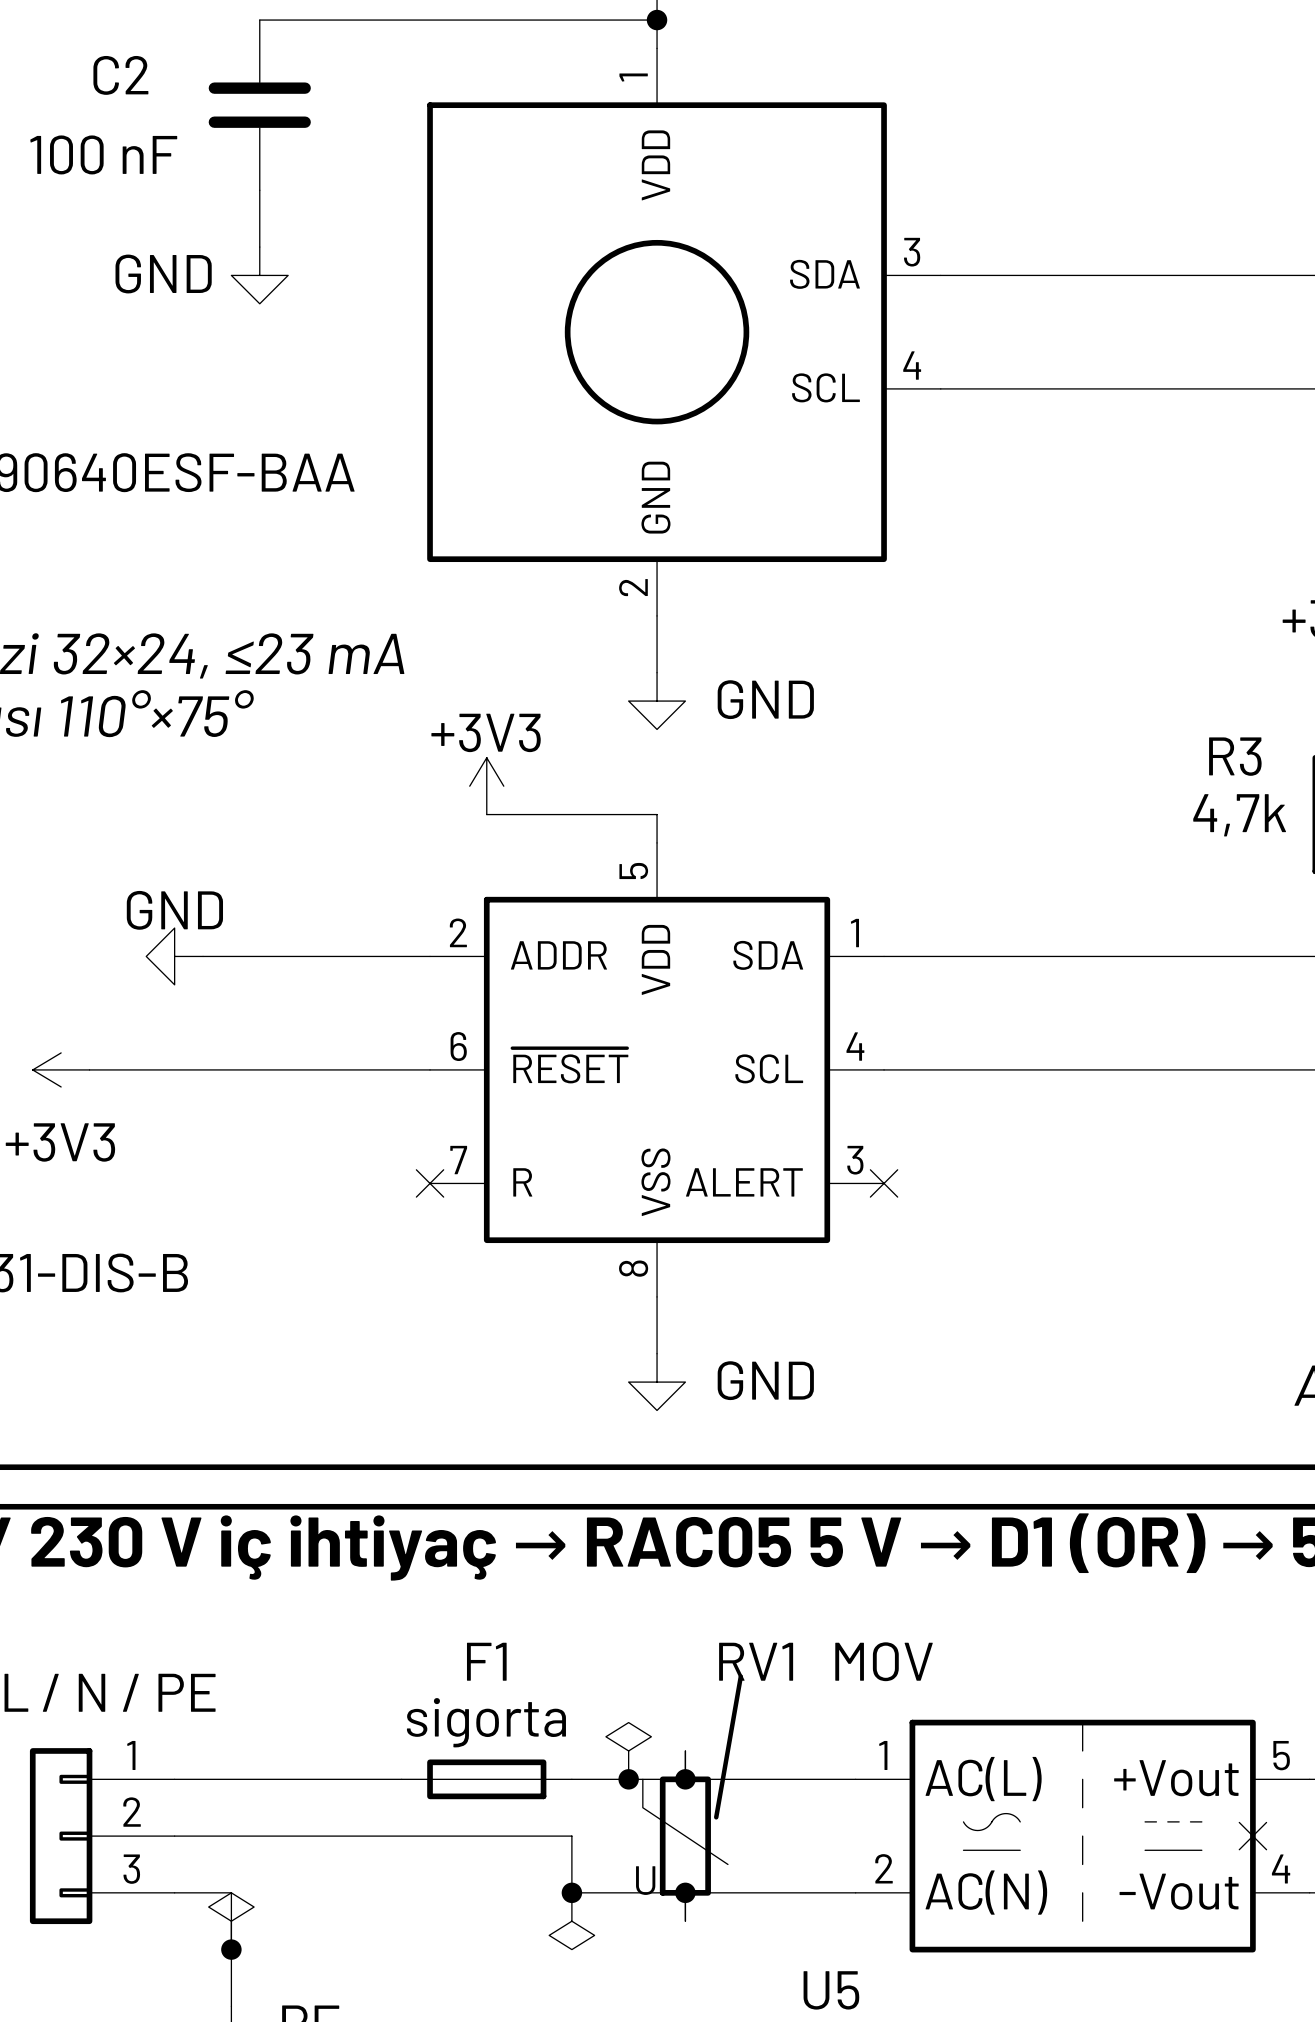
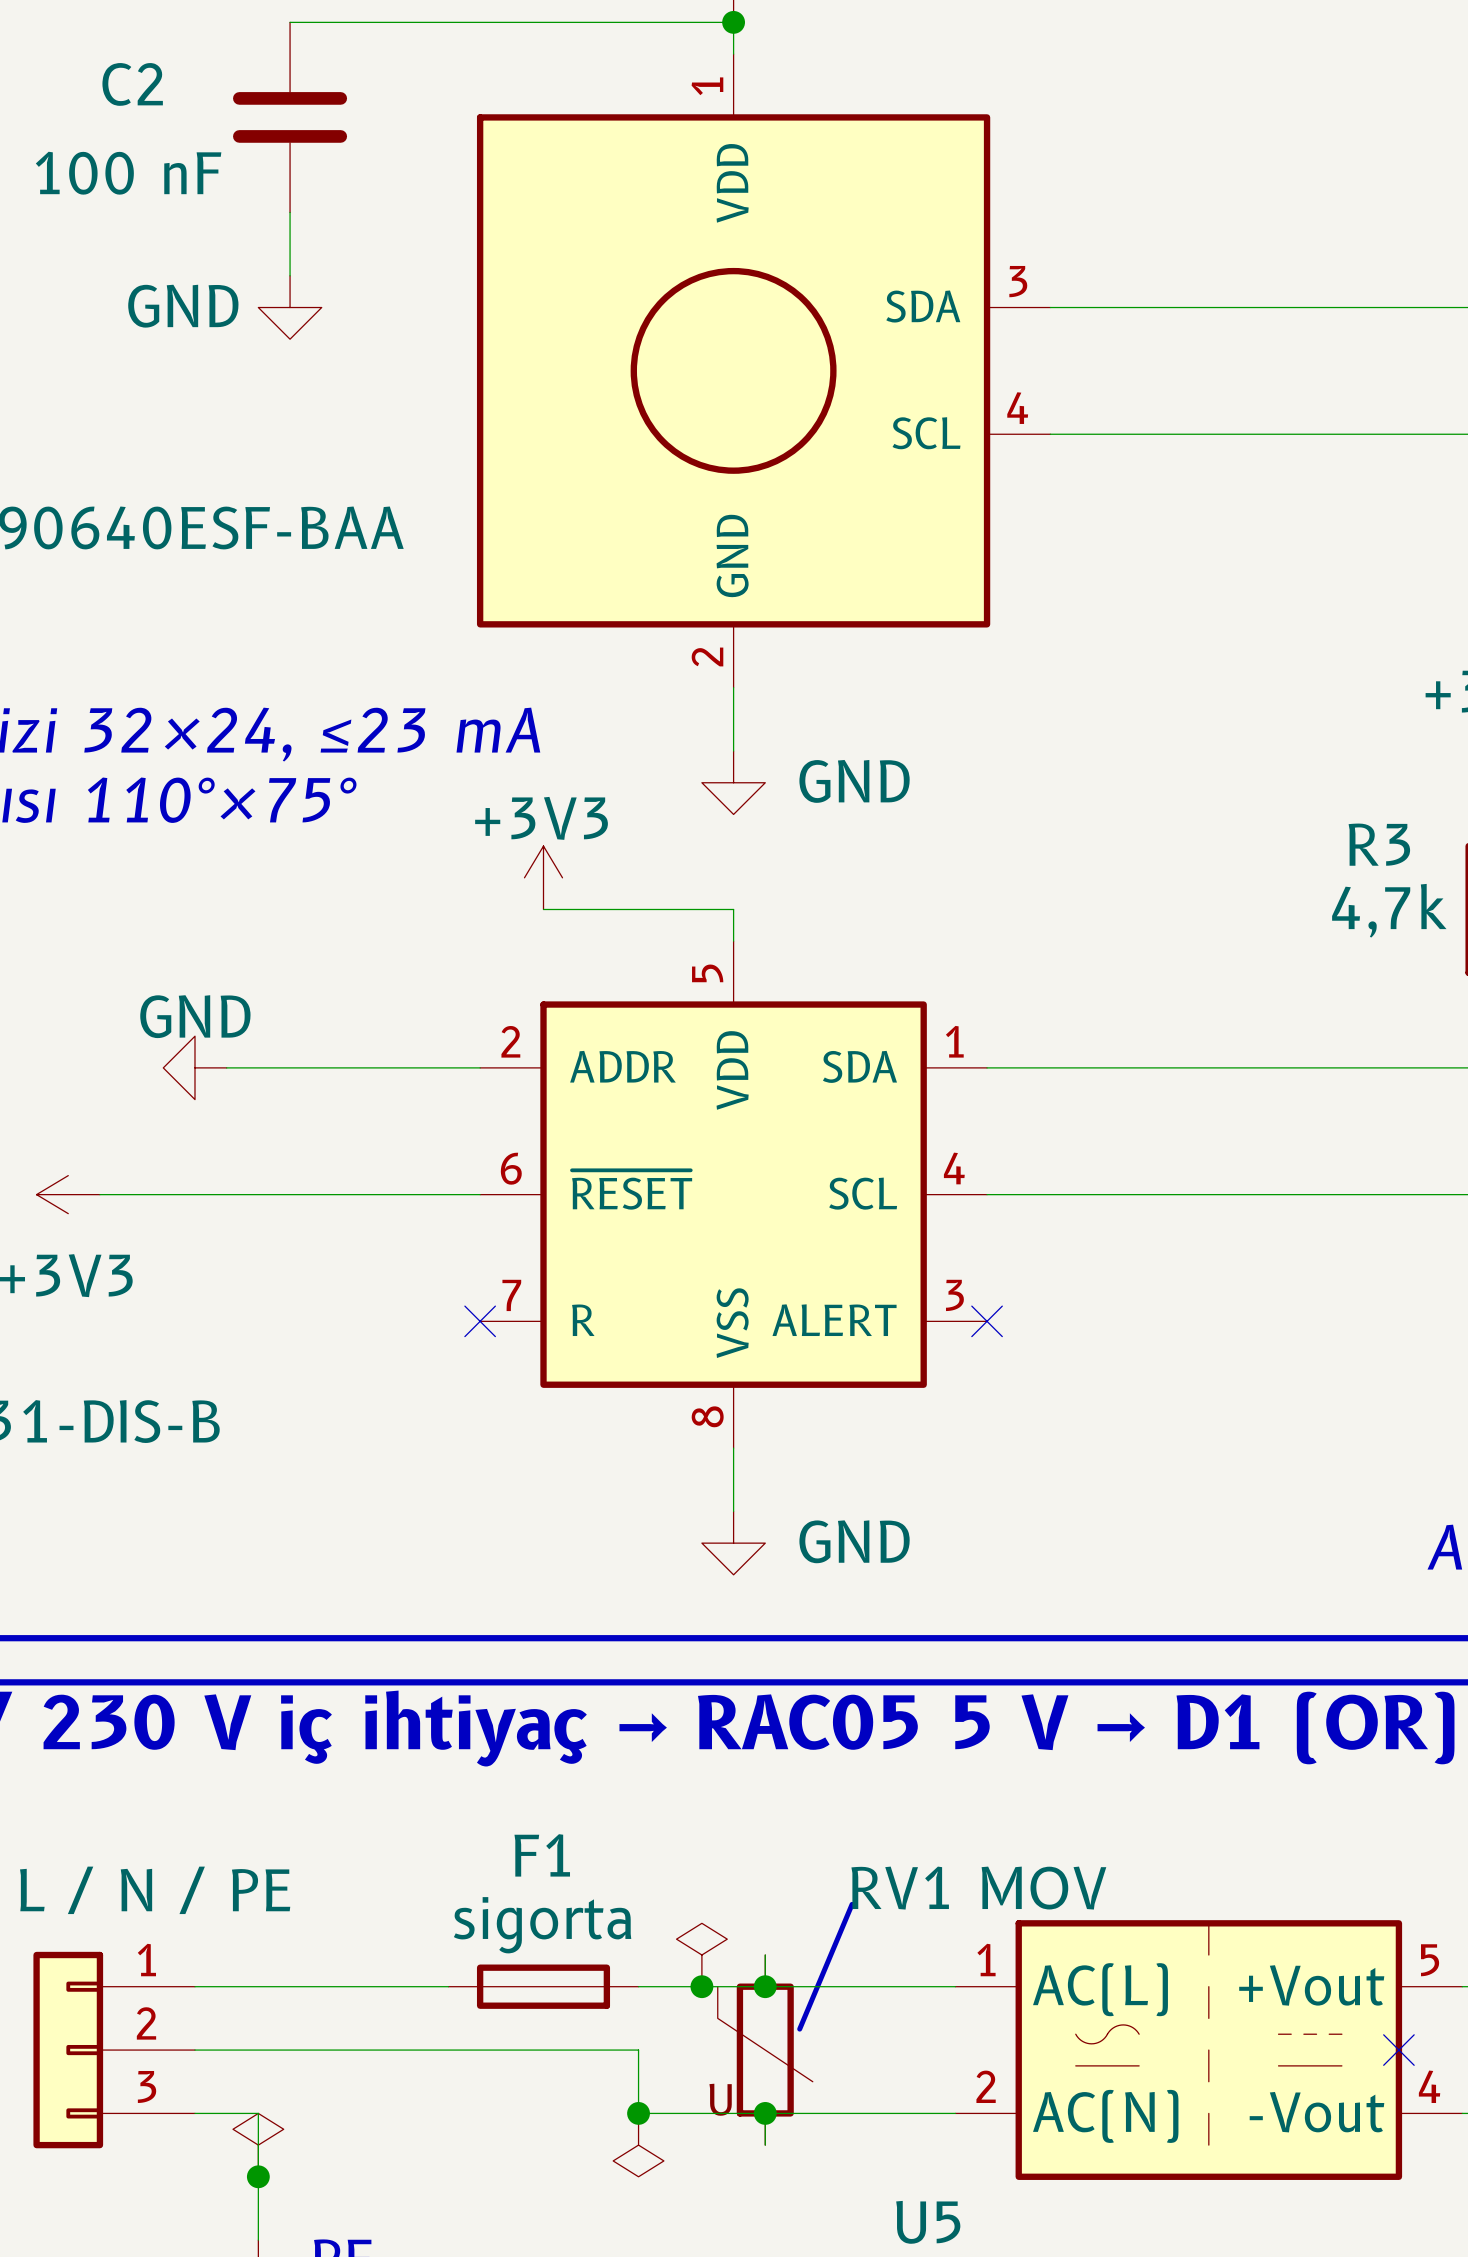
RV1 name position: RV1 (756, 1661) -> RV1 (900, 1888)
RV1 value position: MOV (884, 1661) -> MOV (1043, 1888)
line: (740, 1676) (716, 1817) -> (852, 1904) (799, 2029)

